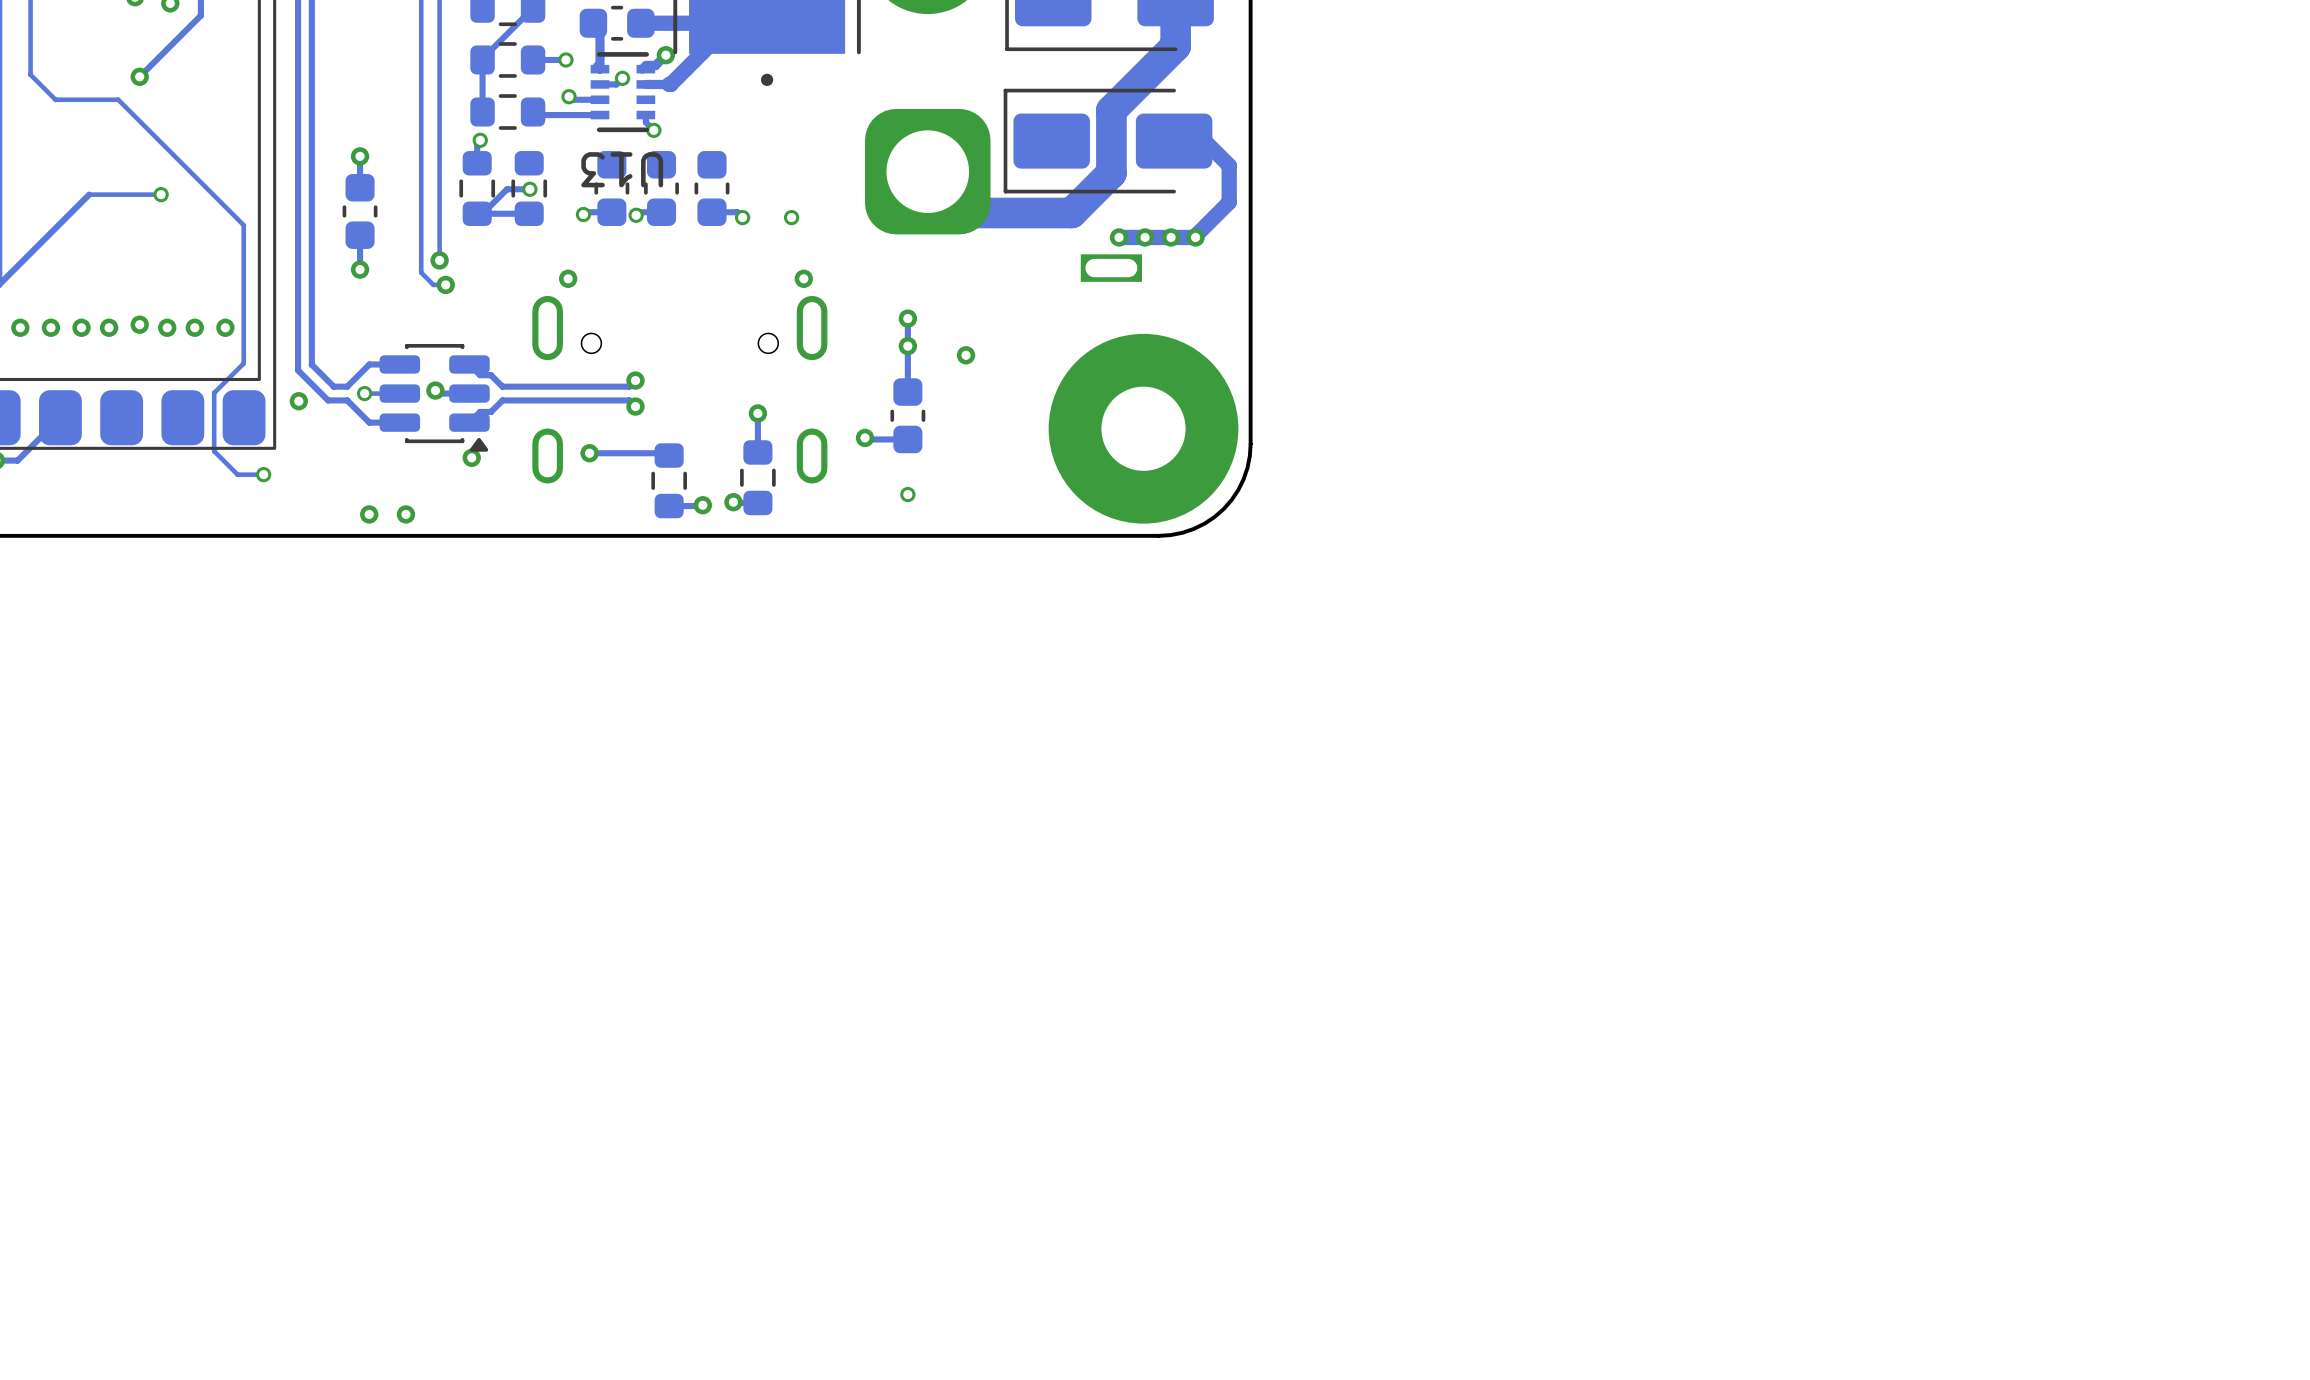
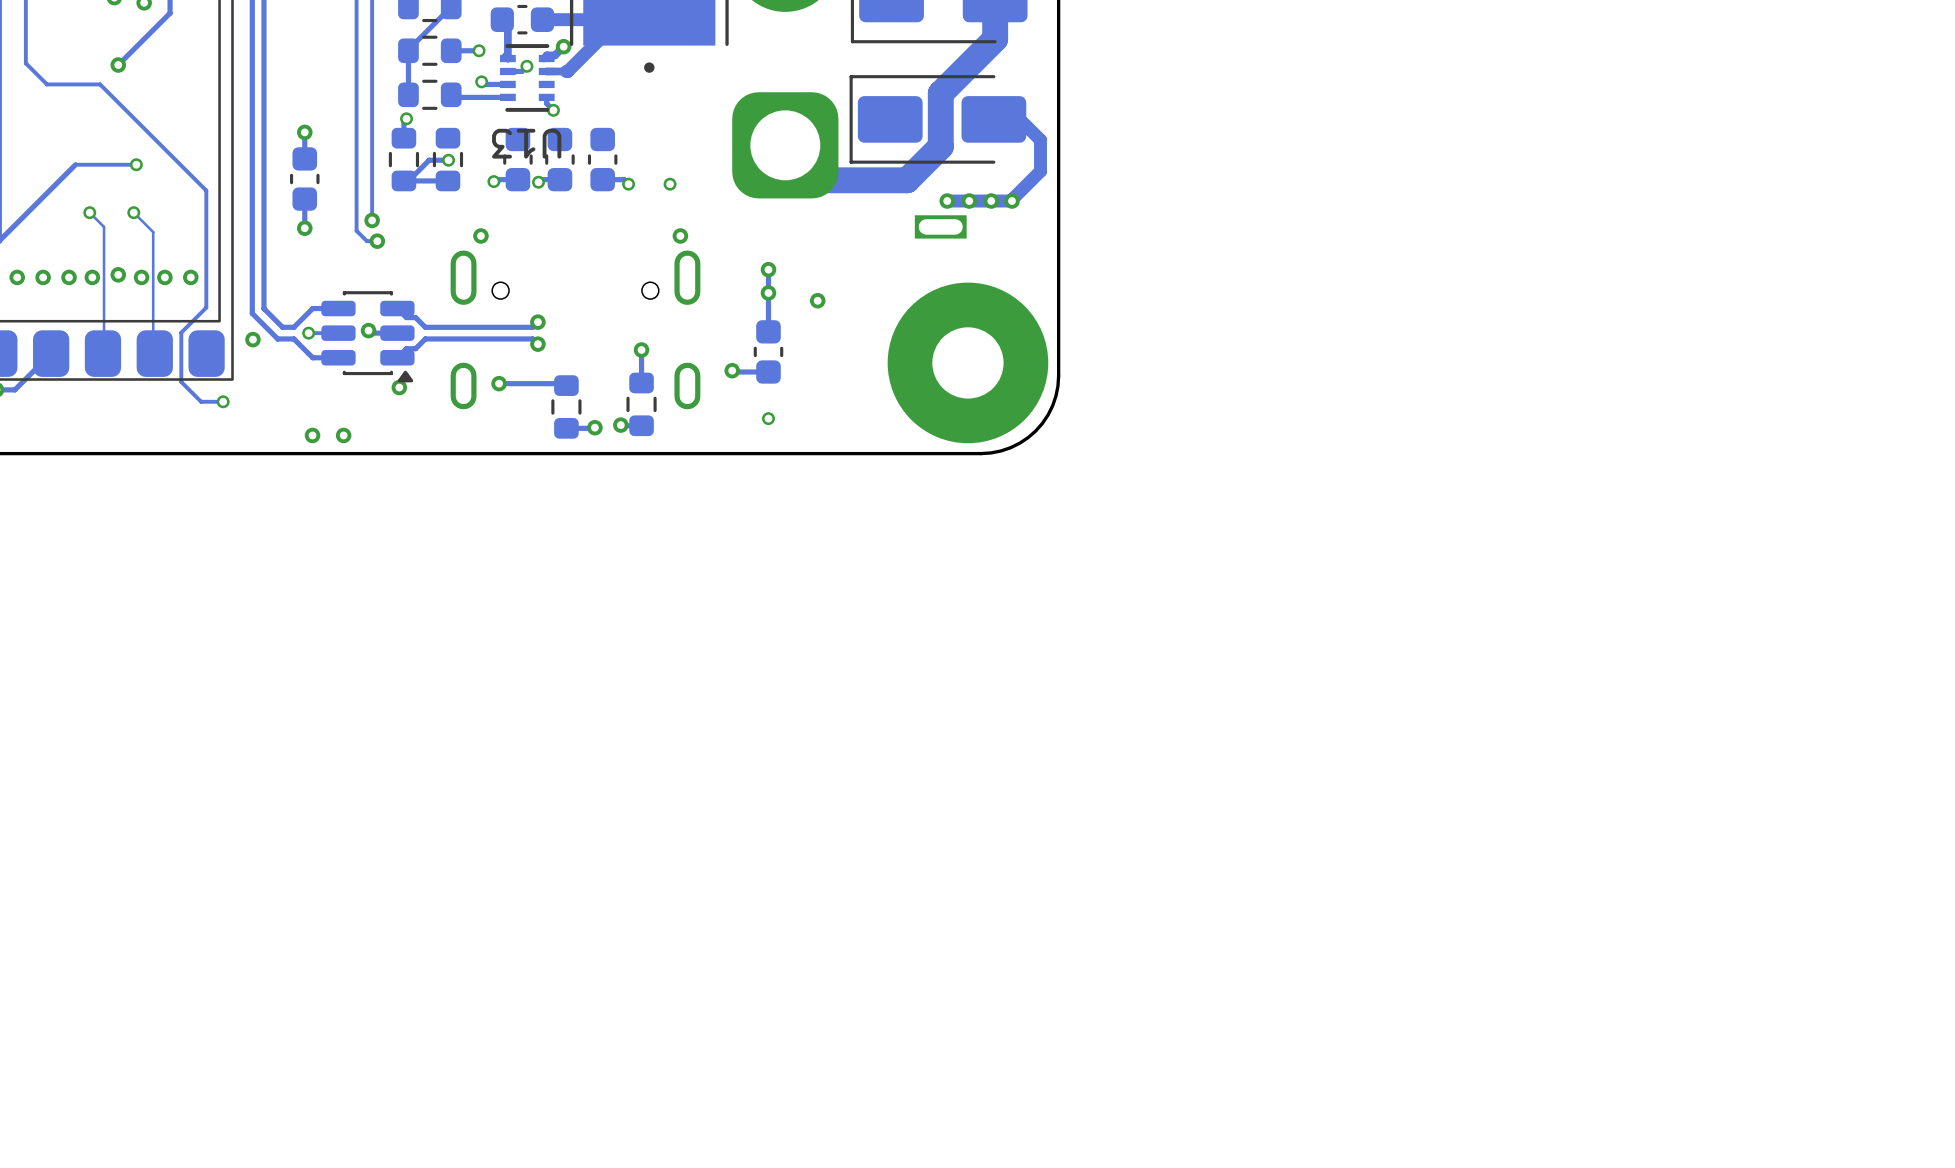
track: none -> (89, 212) (104, 226) (102, 353)
via: none -> (89, 212)
track: none -> (133, 212) (153, 232) (153, 352) (154, 353)
via: none -> (133, 212)

